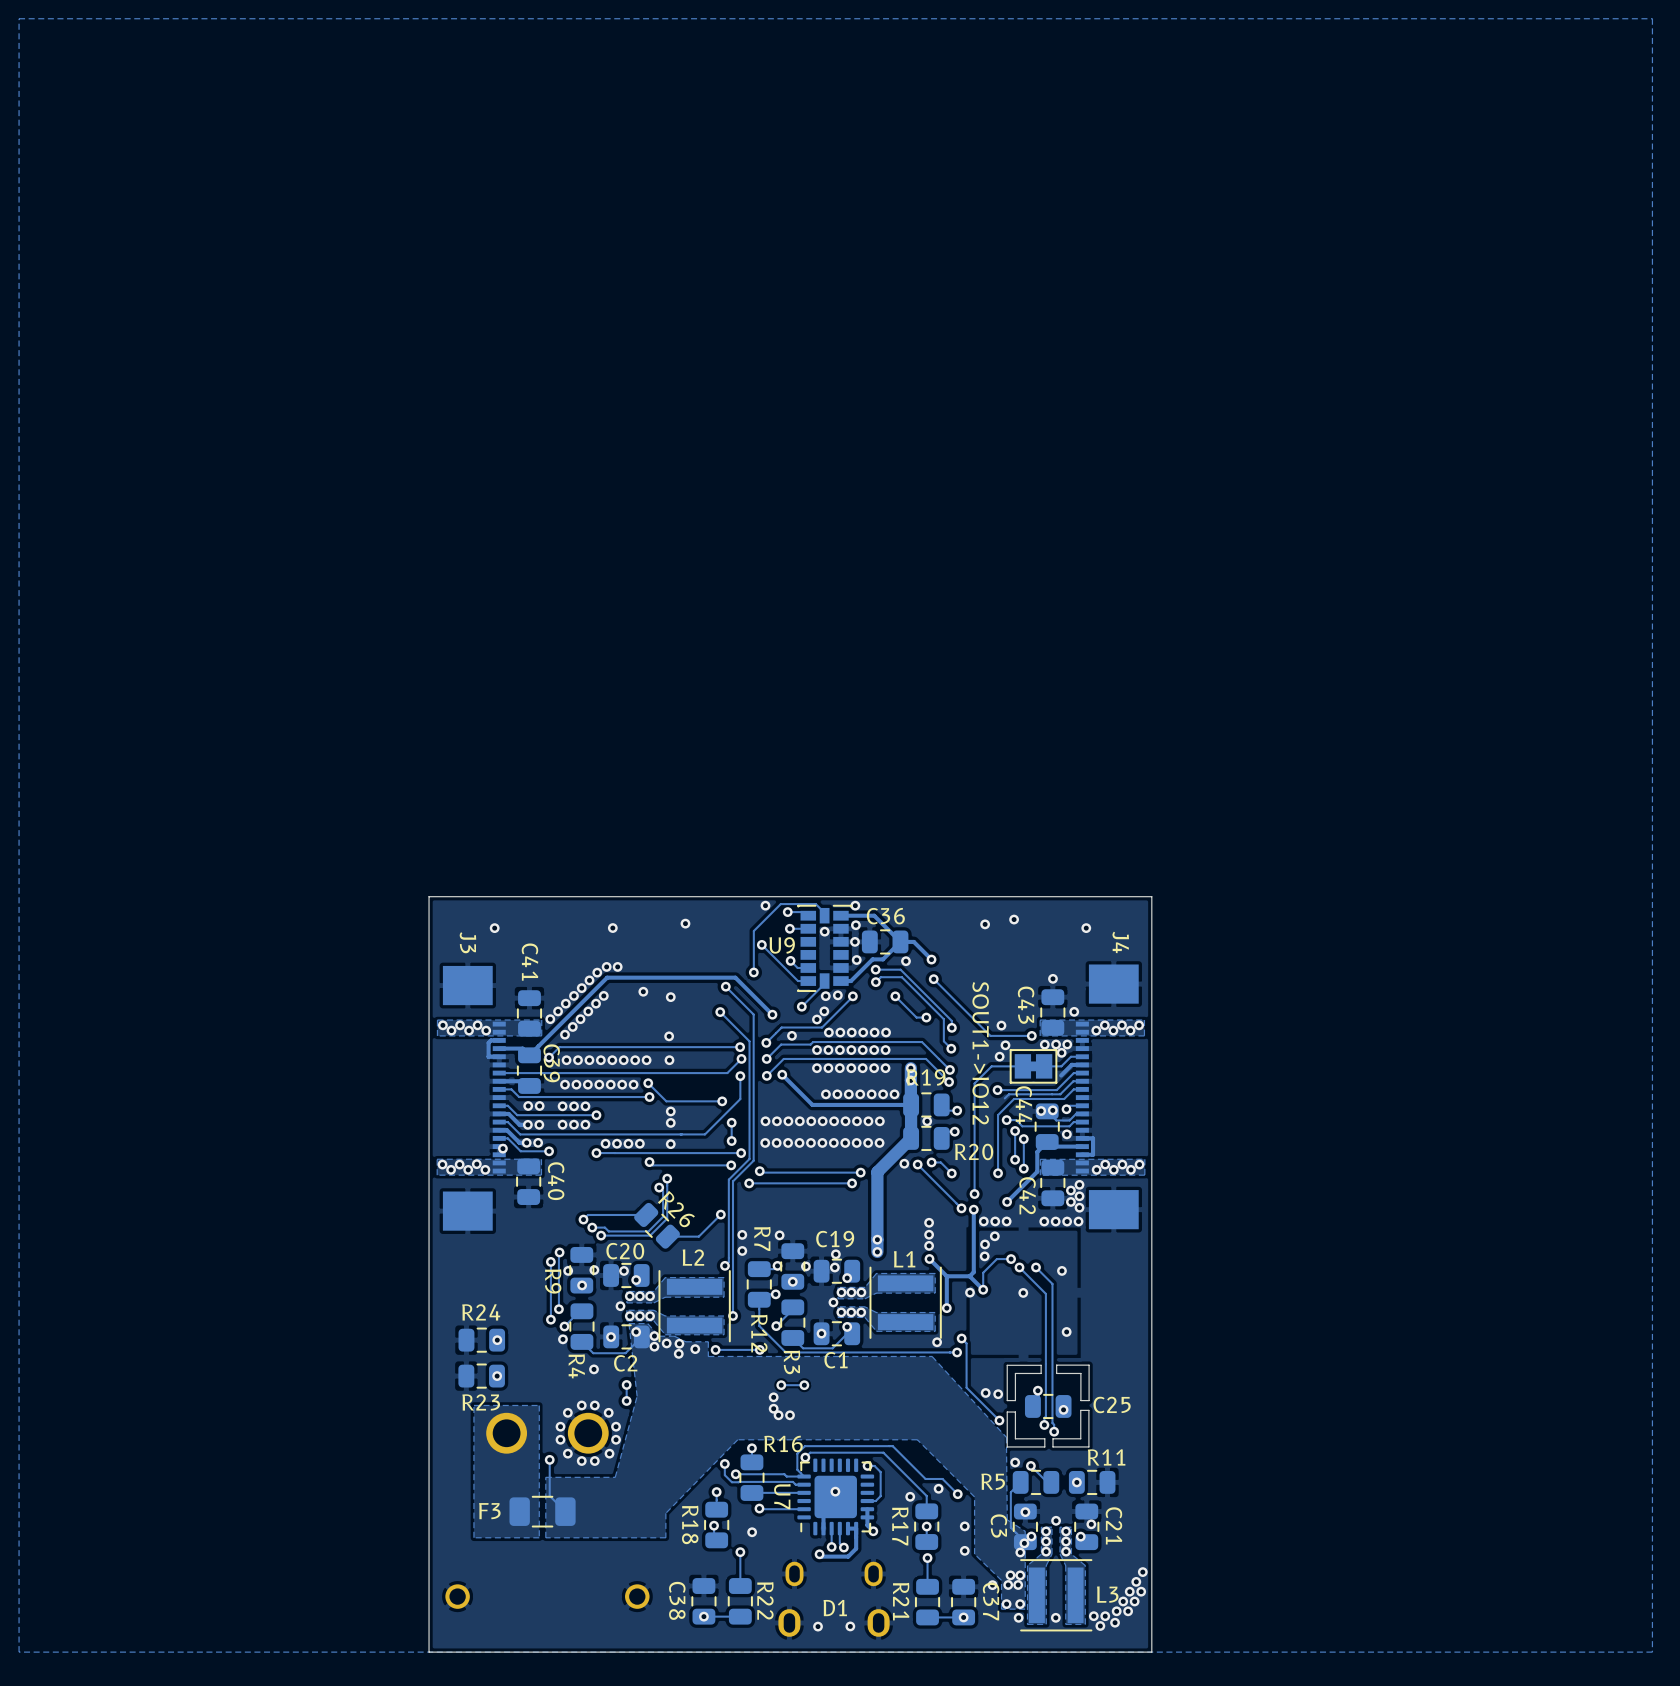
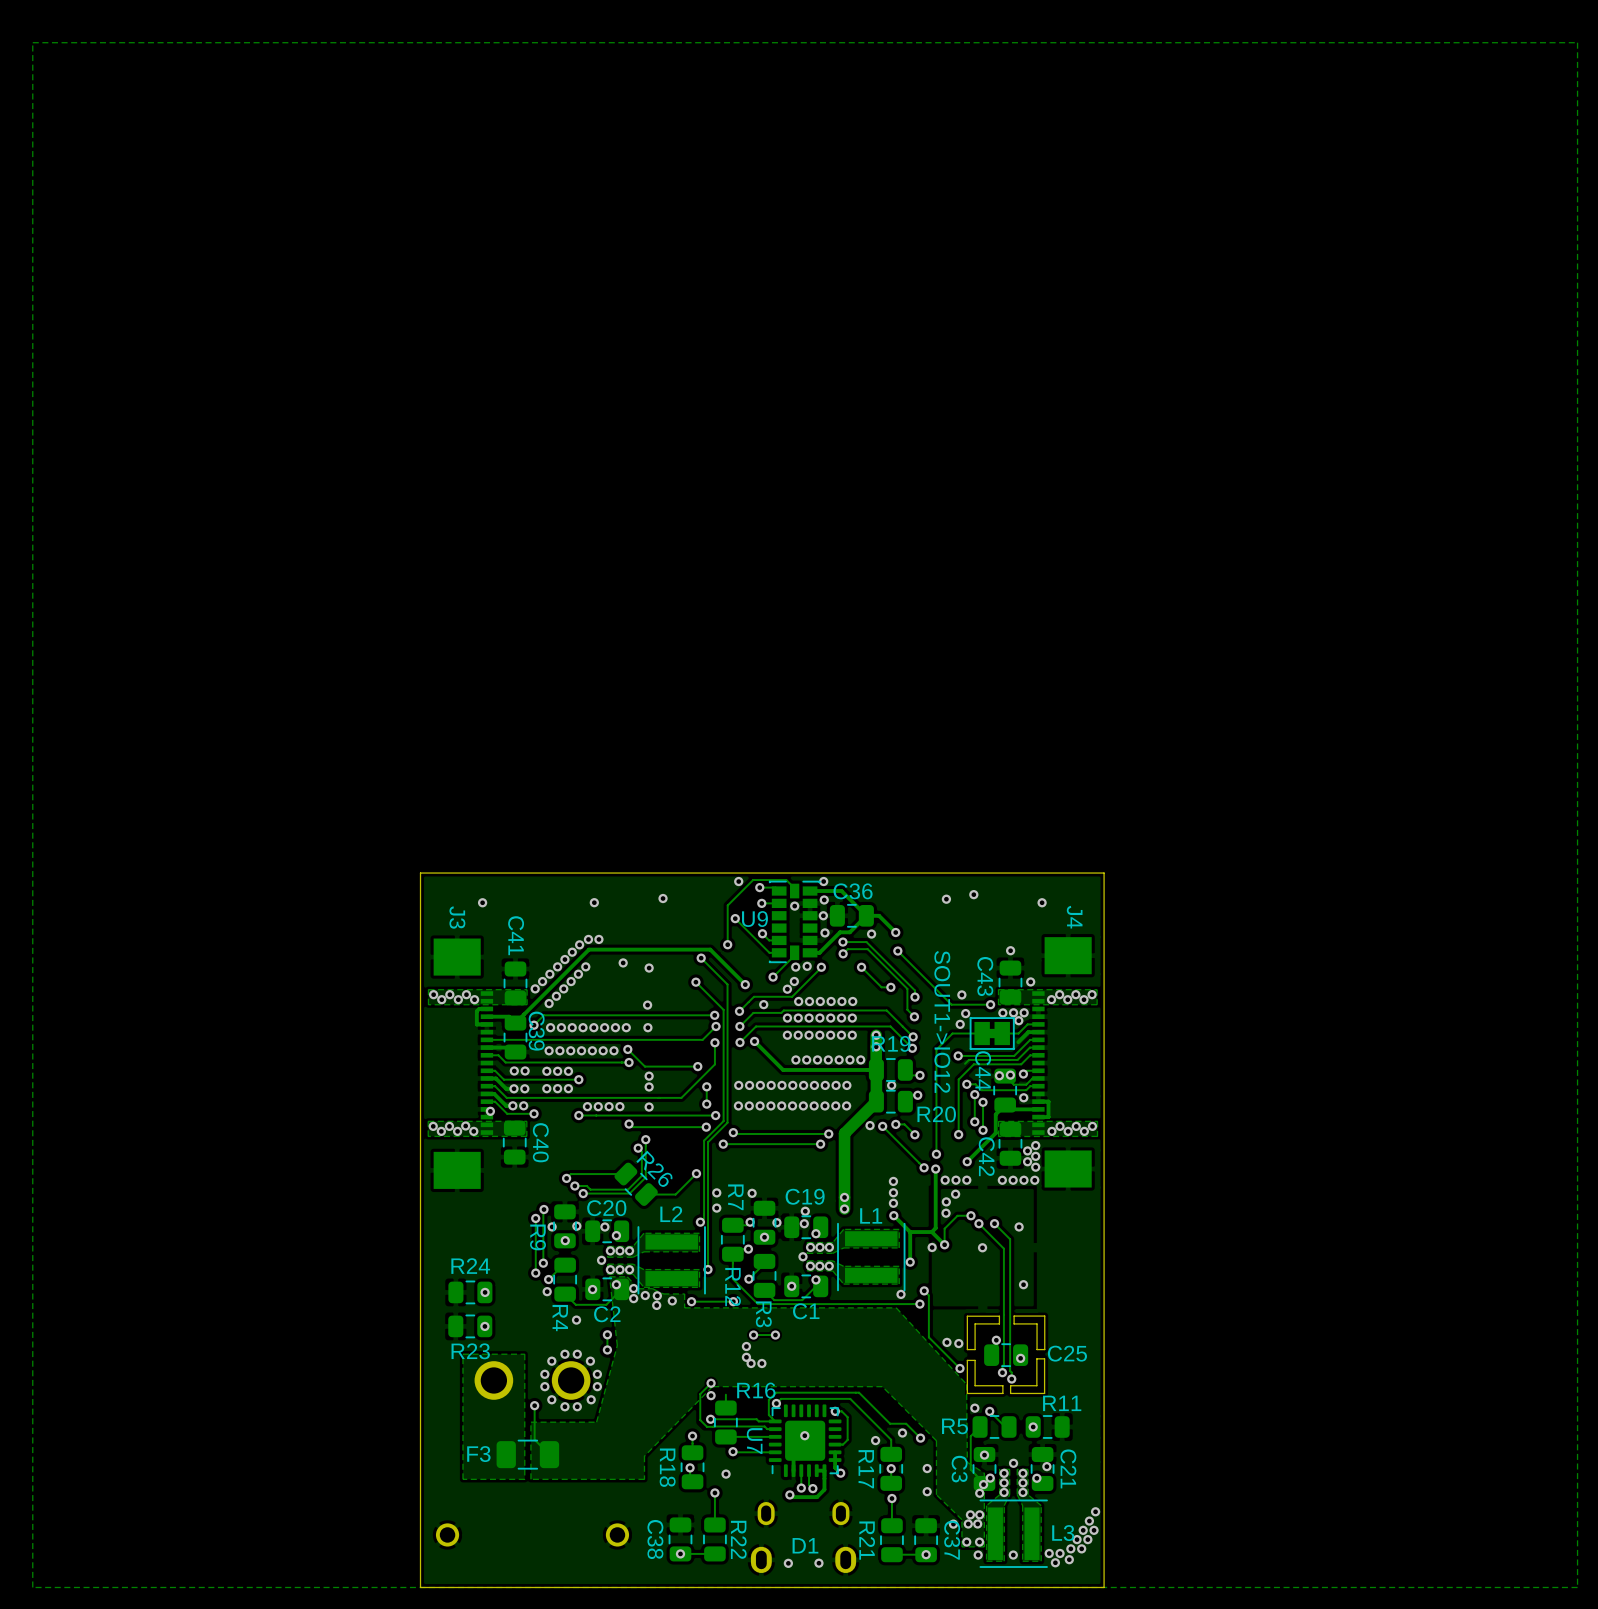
track: none -> (711, 1383) (700, 1394) (700, 1409)
via: none -> (711, 1383)
via: (751, 1448) -> none
via: none -> (711, 1395)
via: (724, 1463) -> none

